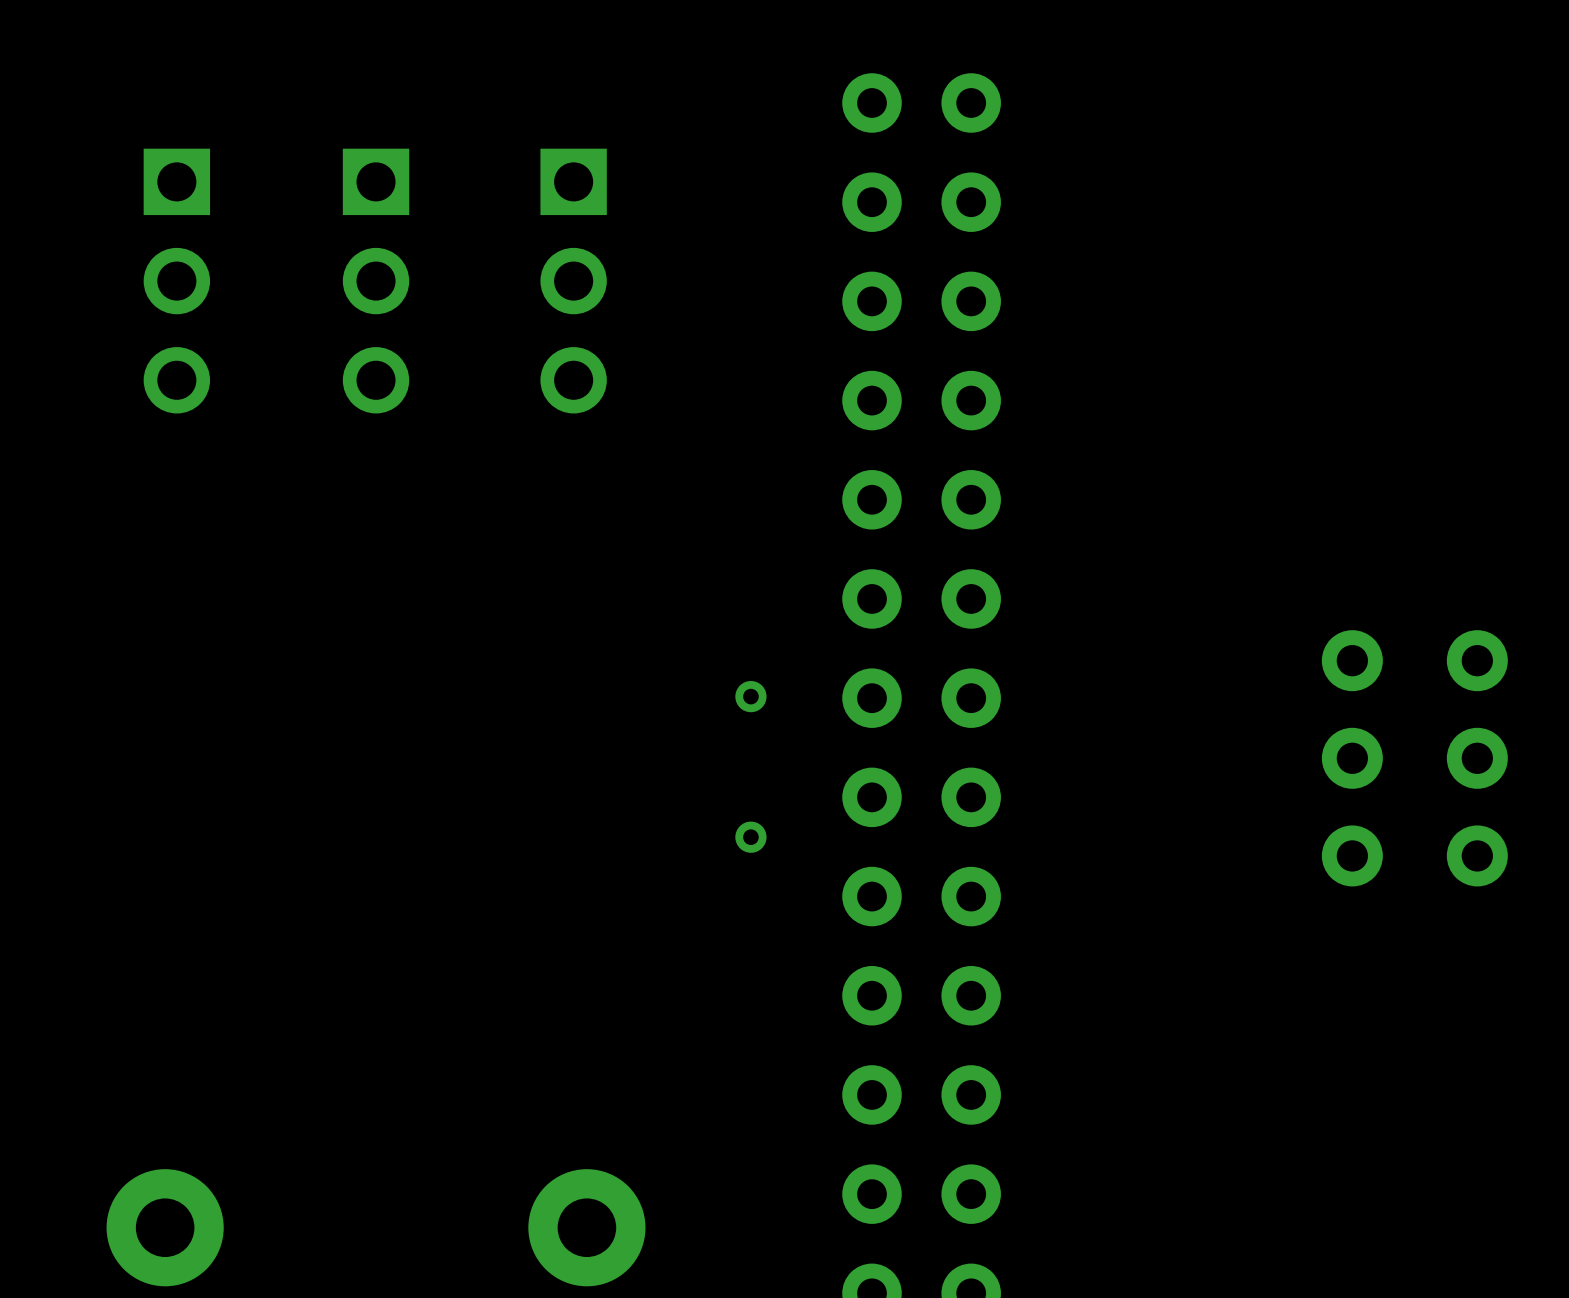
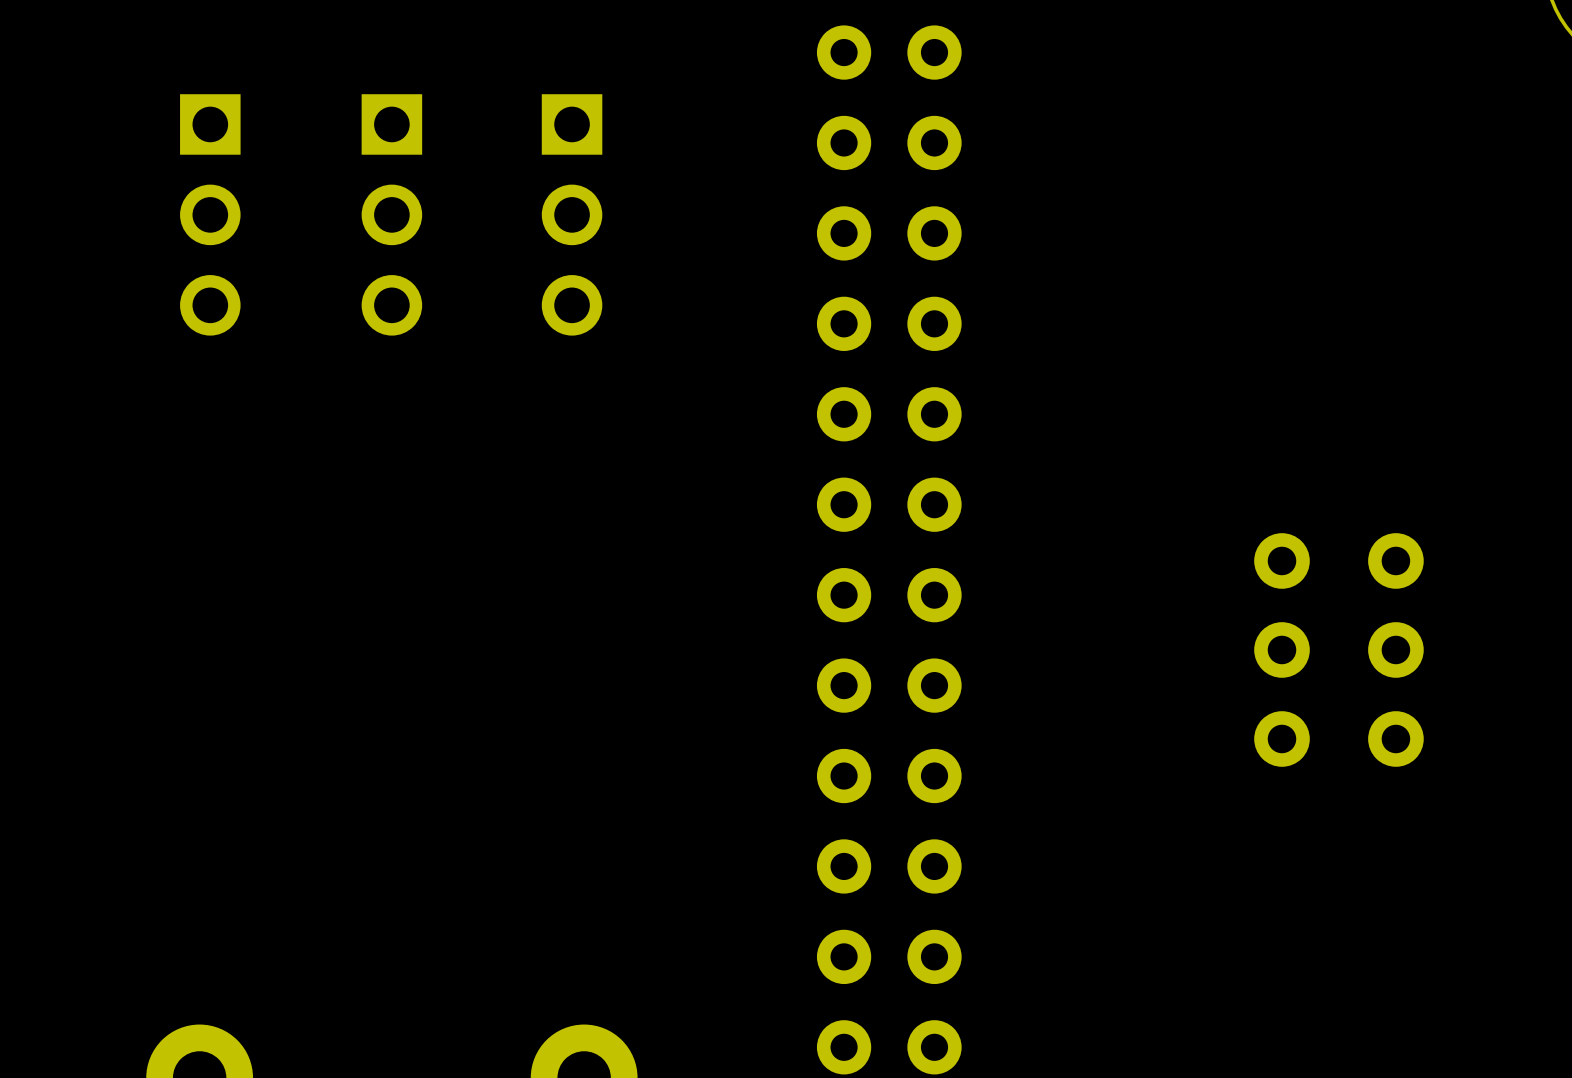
via: (750, 696) -> none
via: (750, 837) -> none

